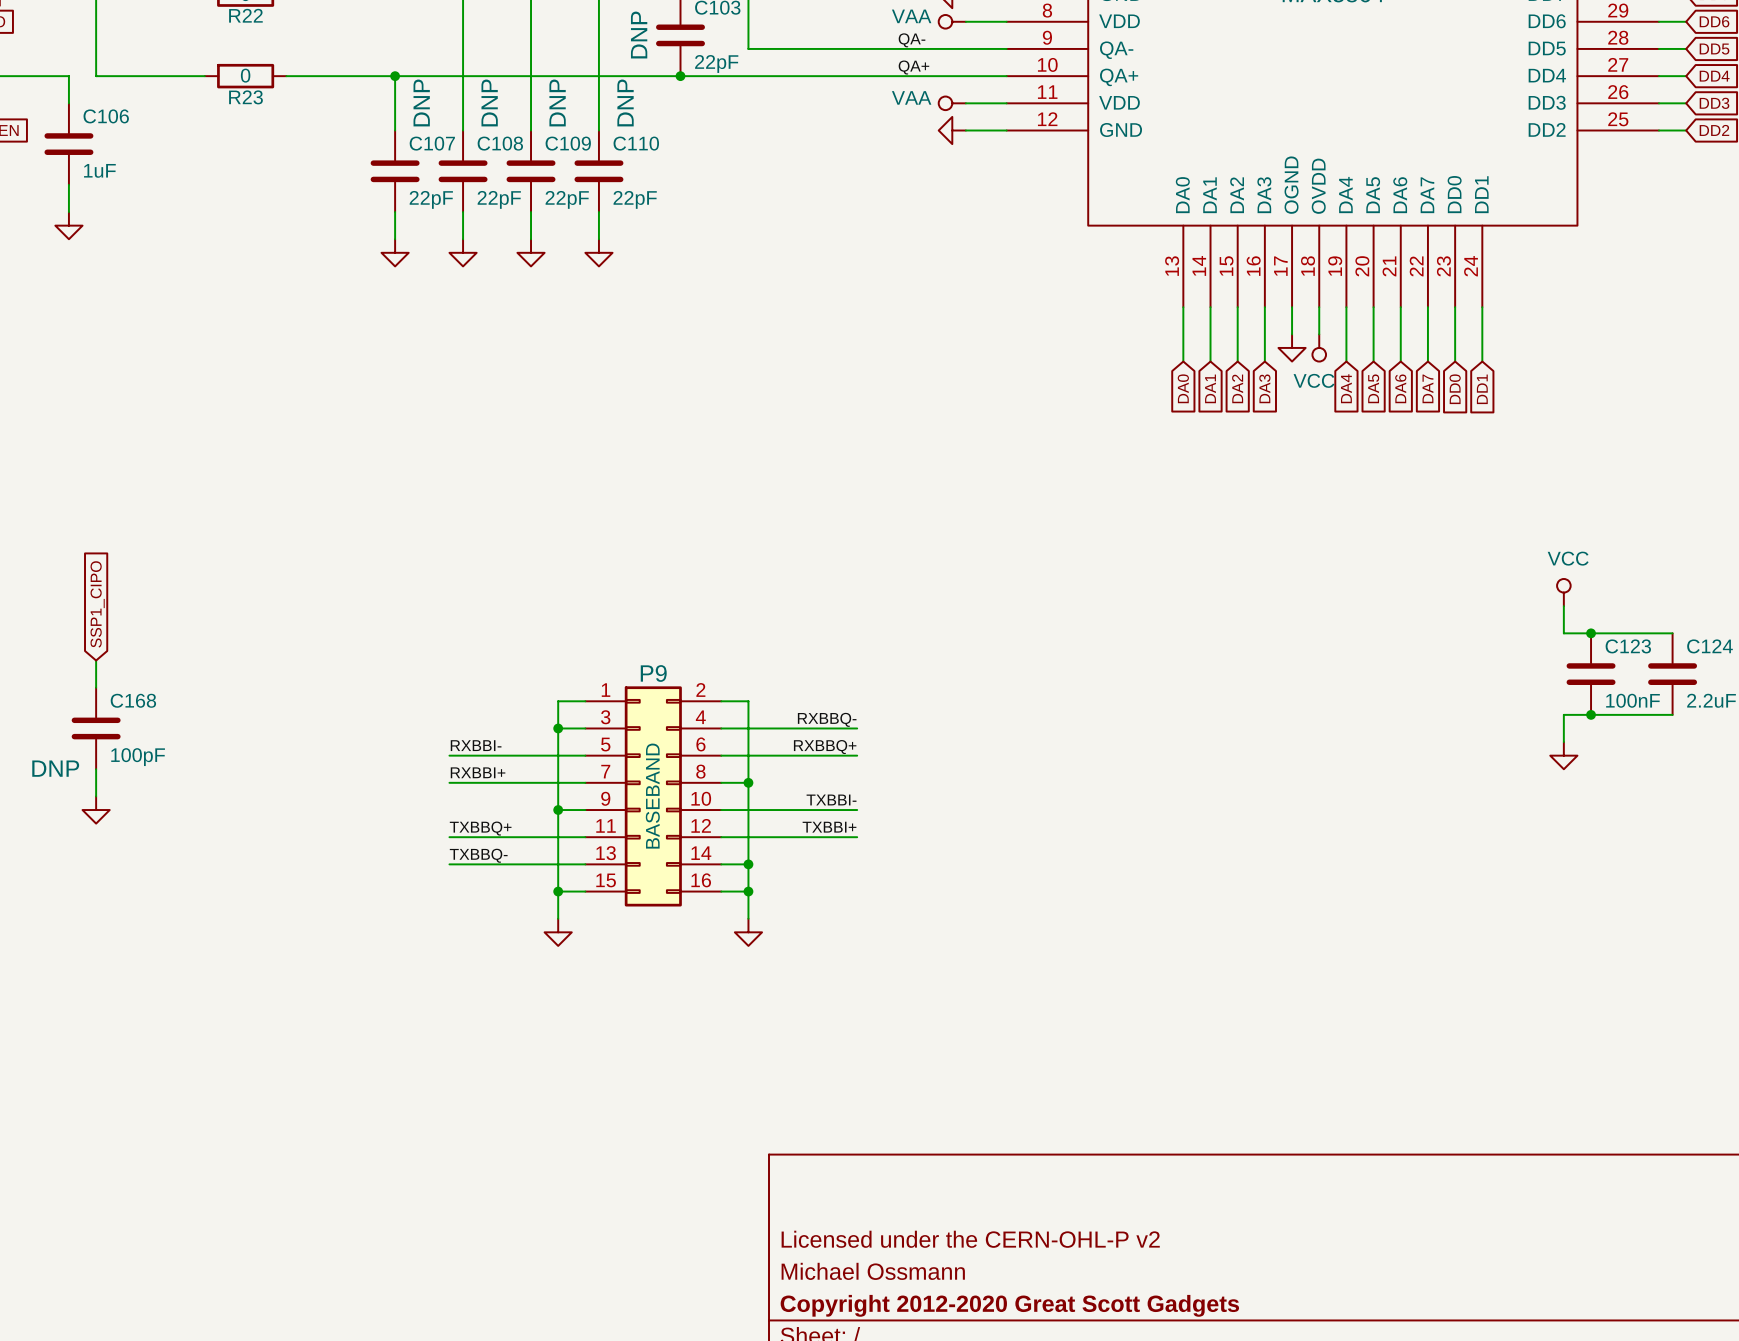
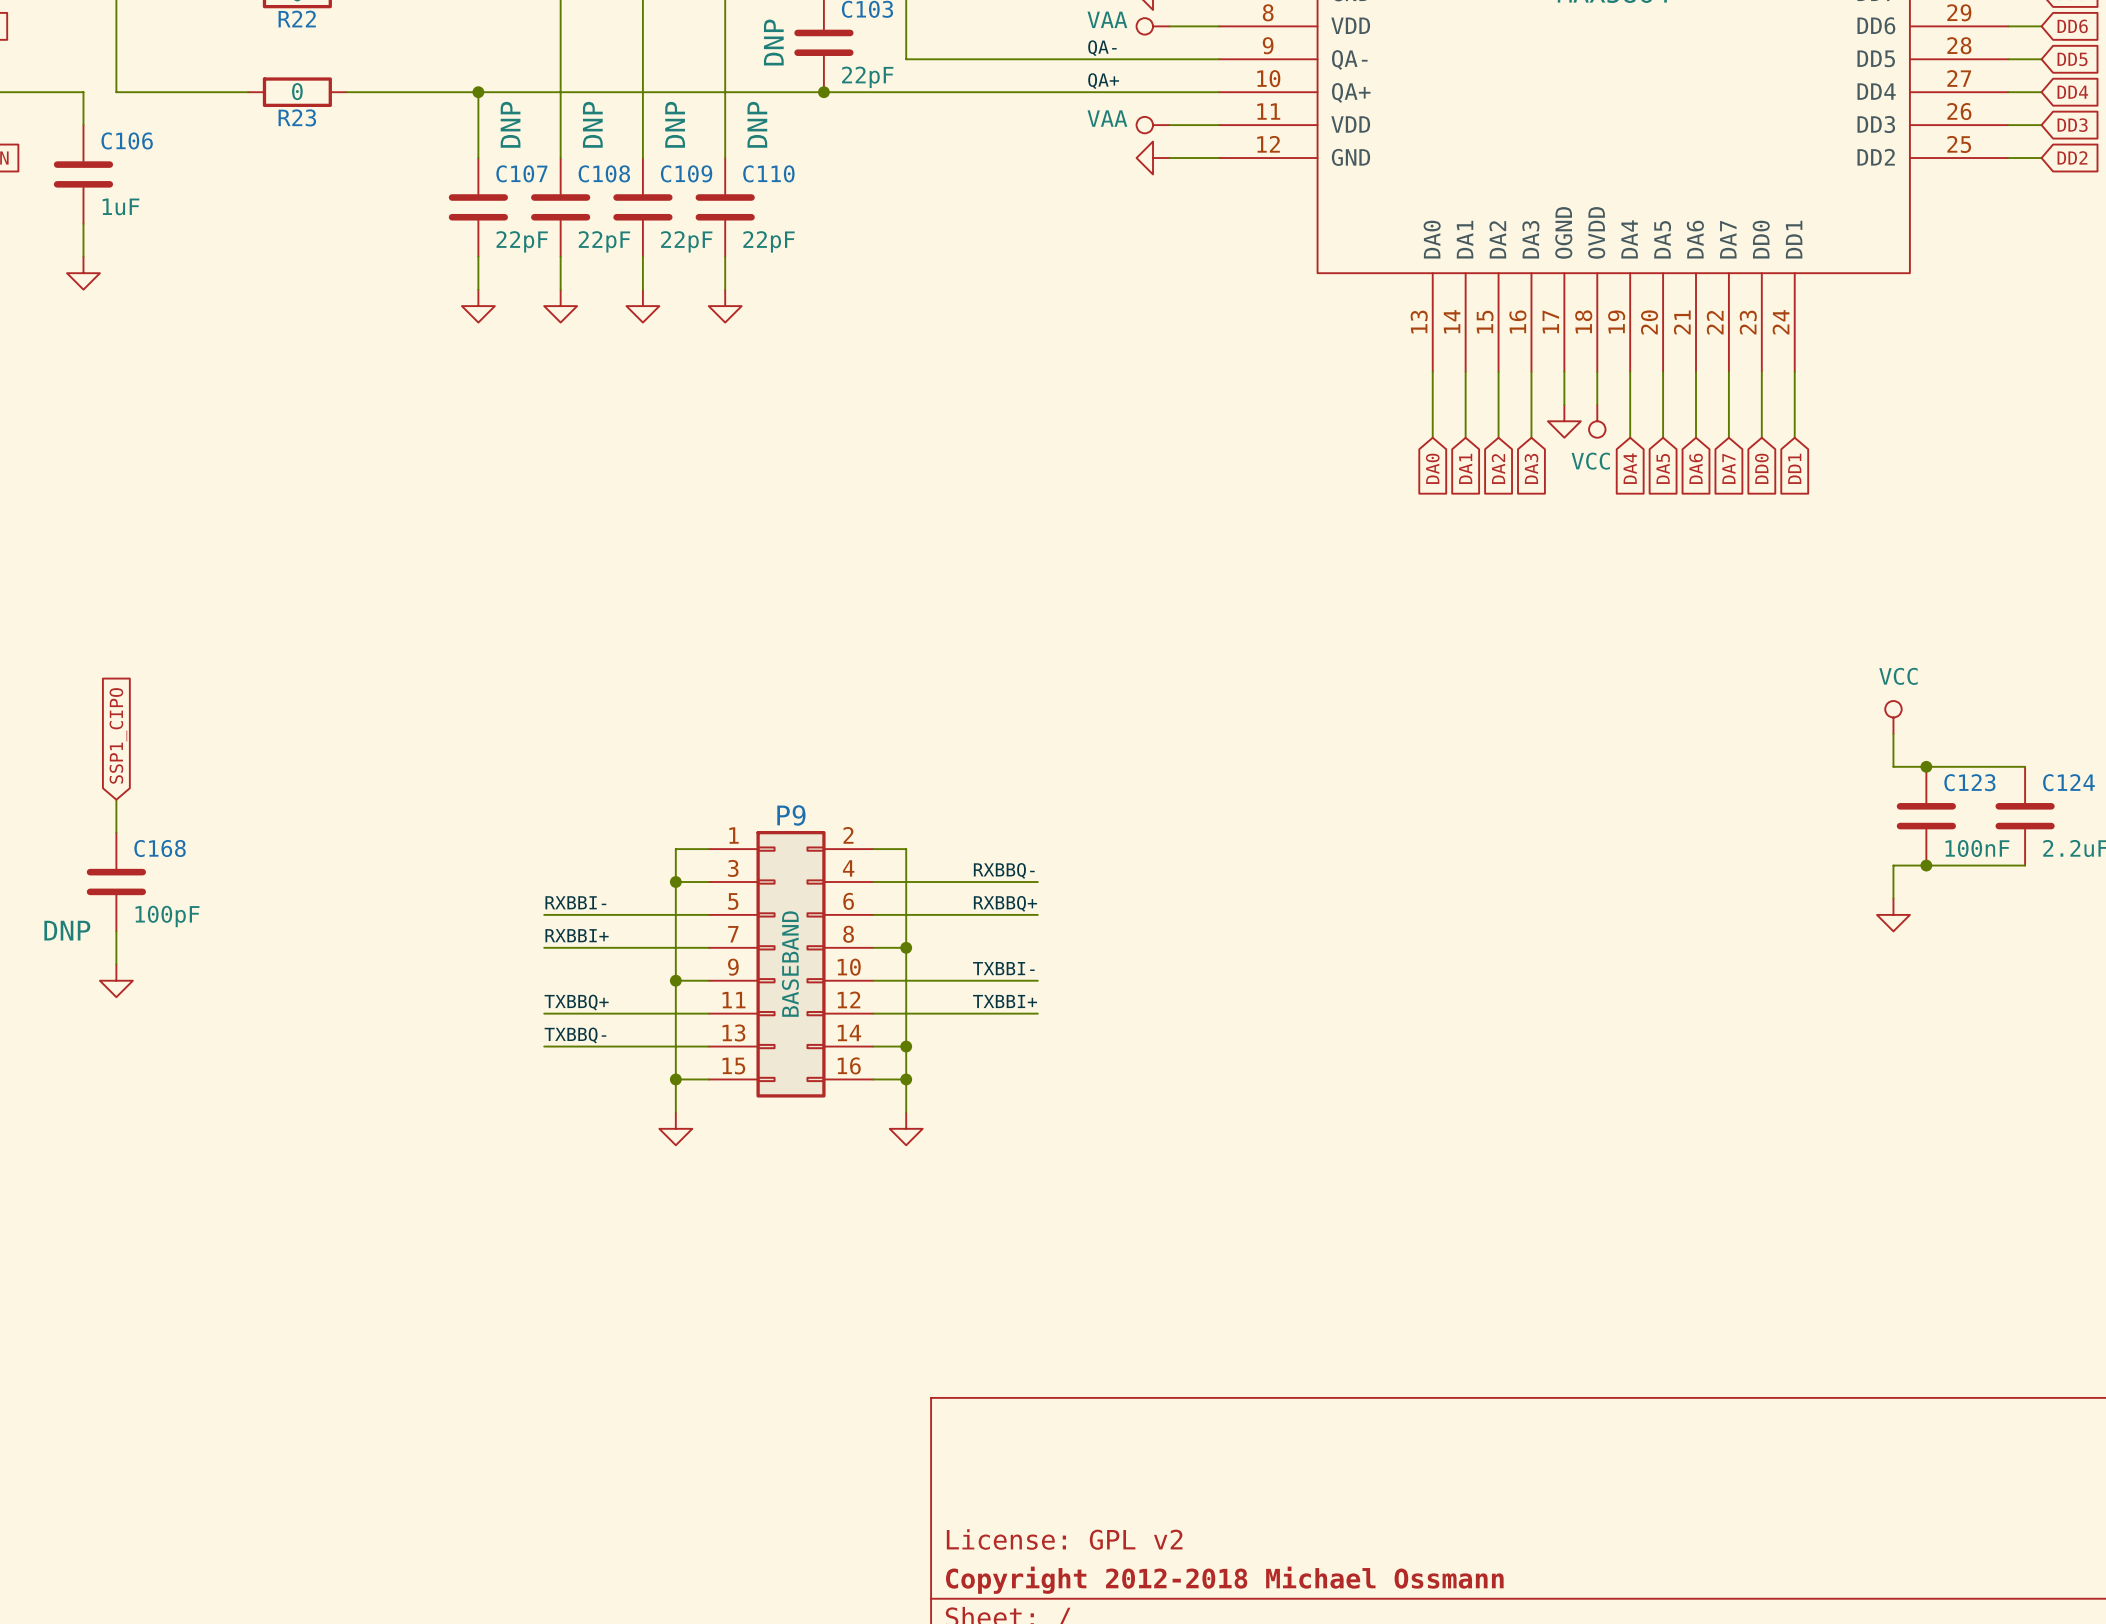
title block: Licensed under the CERN-OHL-P v2 (970, 1239) -> none
title block: Michael Ossmann (873, 1271) -> License: GPL v2 (1064, 1539)
title block: Copyright 2012-2020 Great Scott Gadgets (1009, 1305) -> Copyright 2012-2018 Michael Ossmann (1224, 1580)

